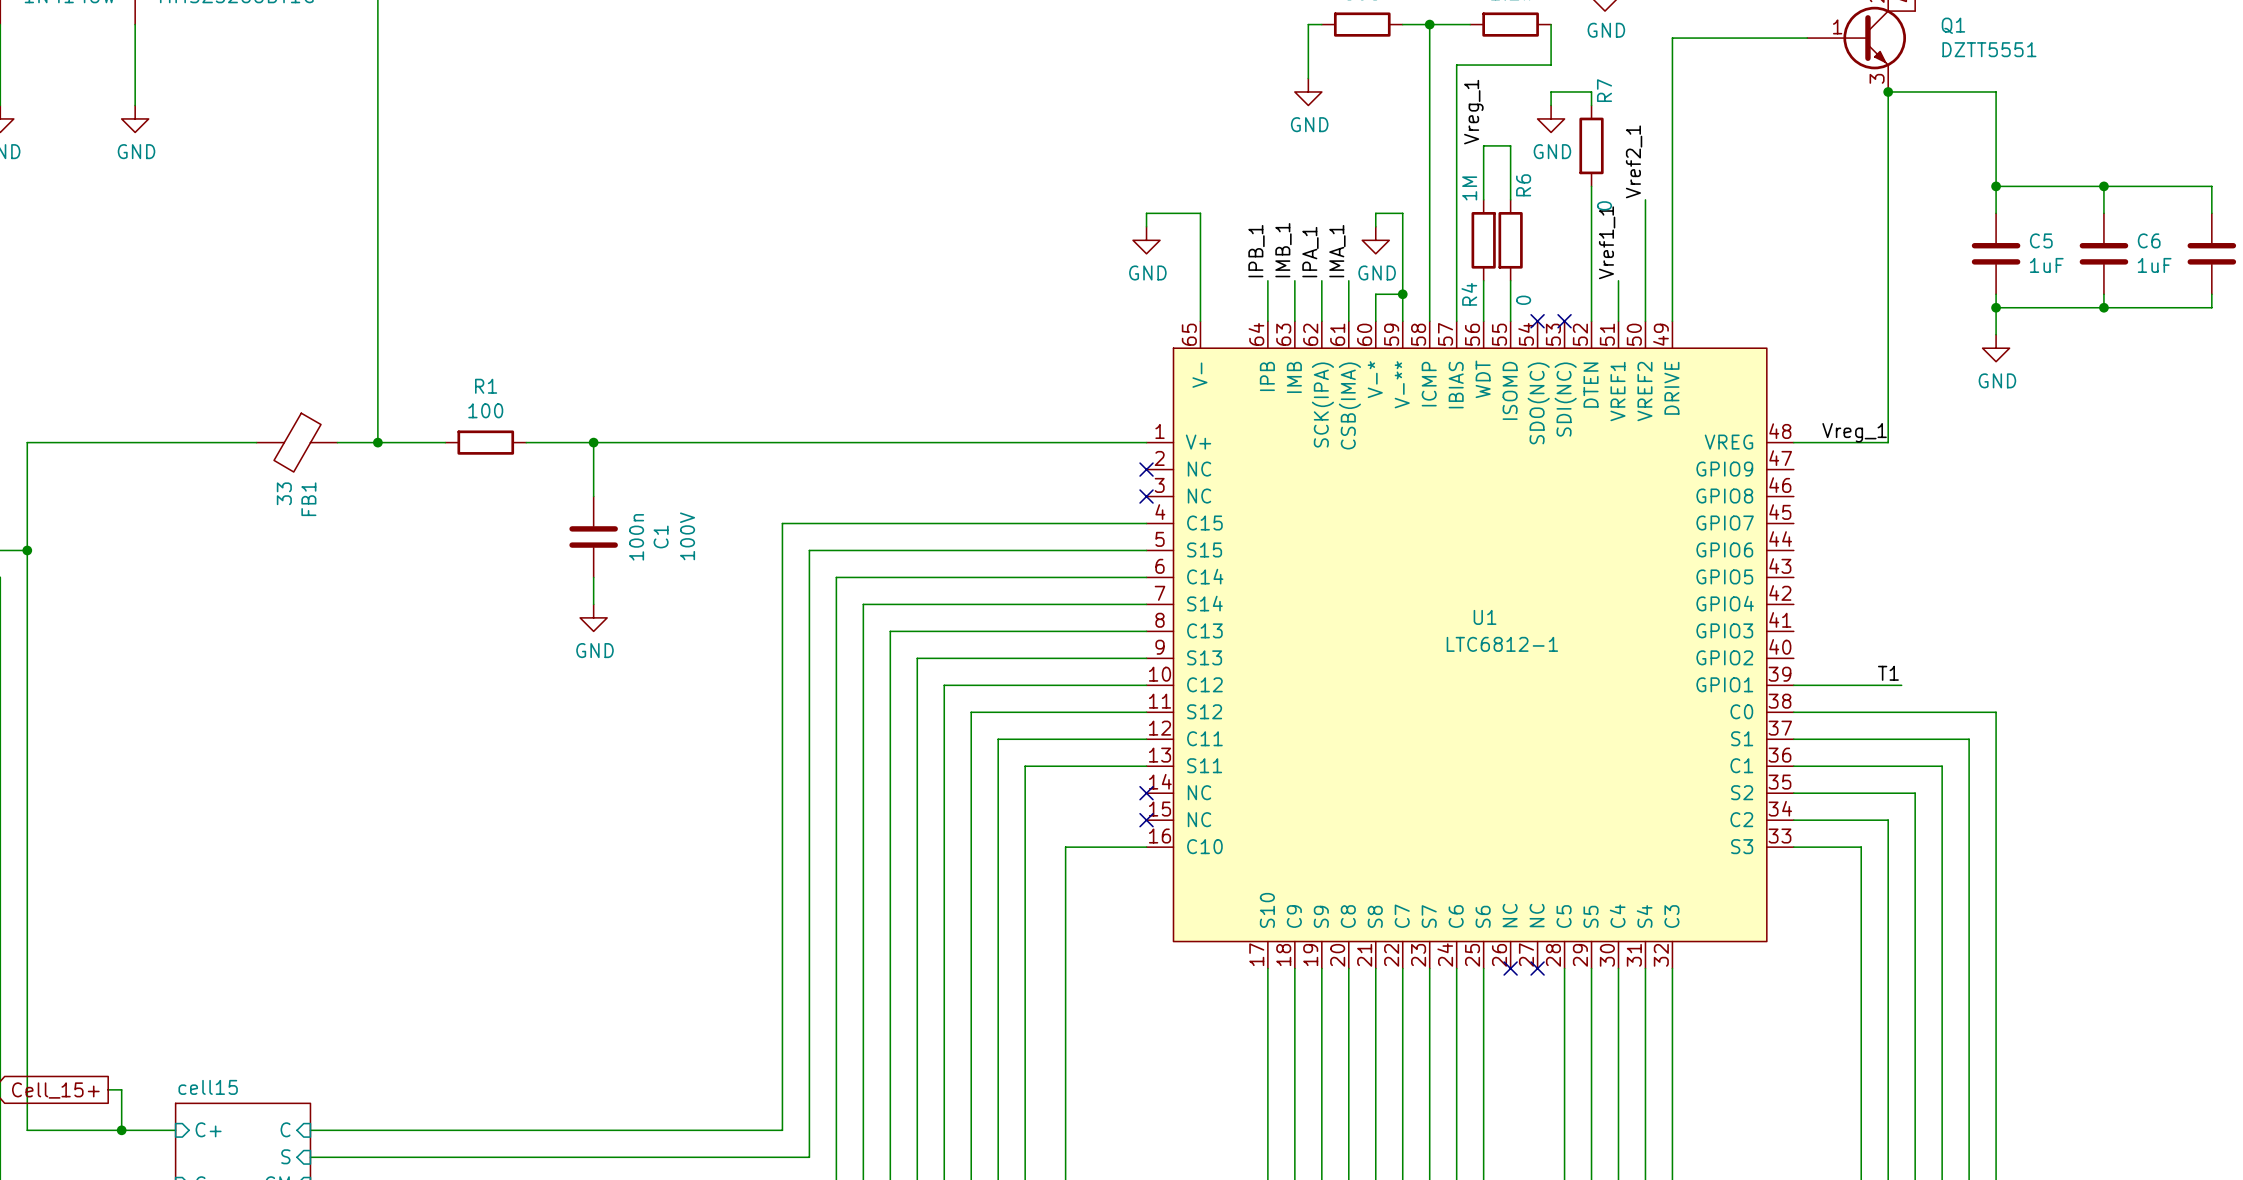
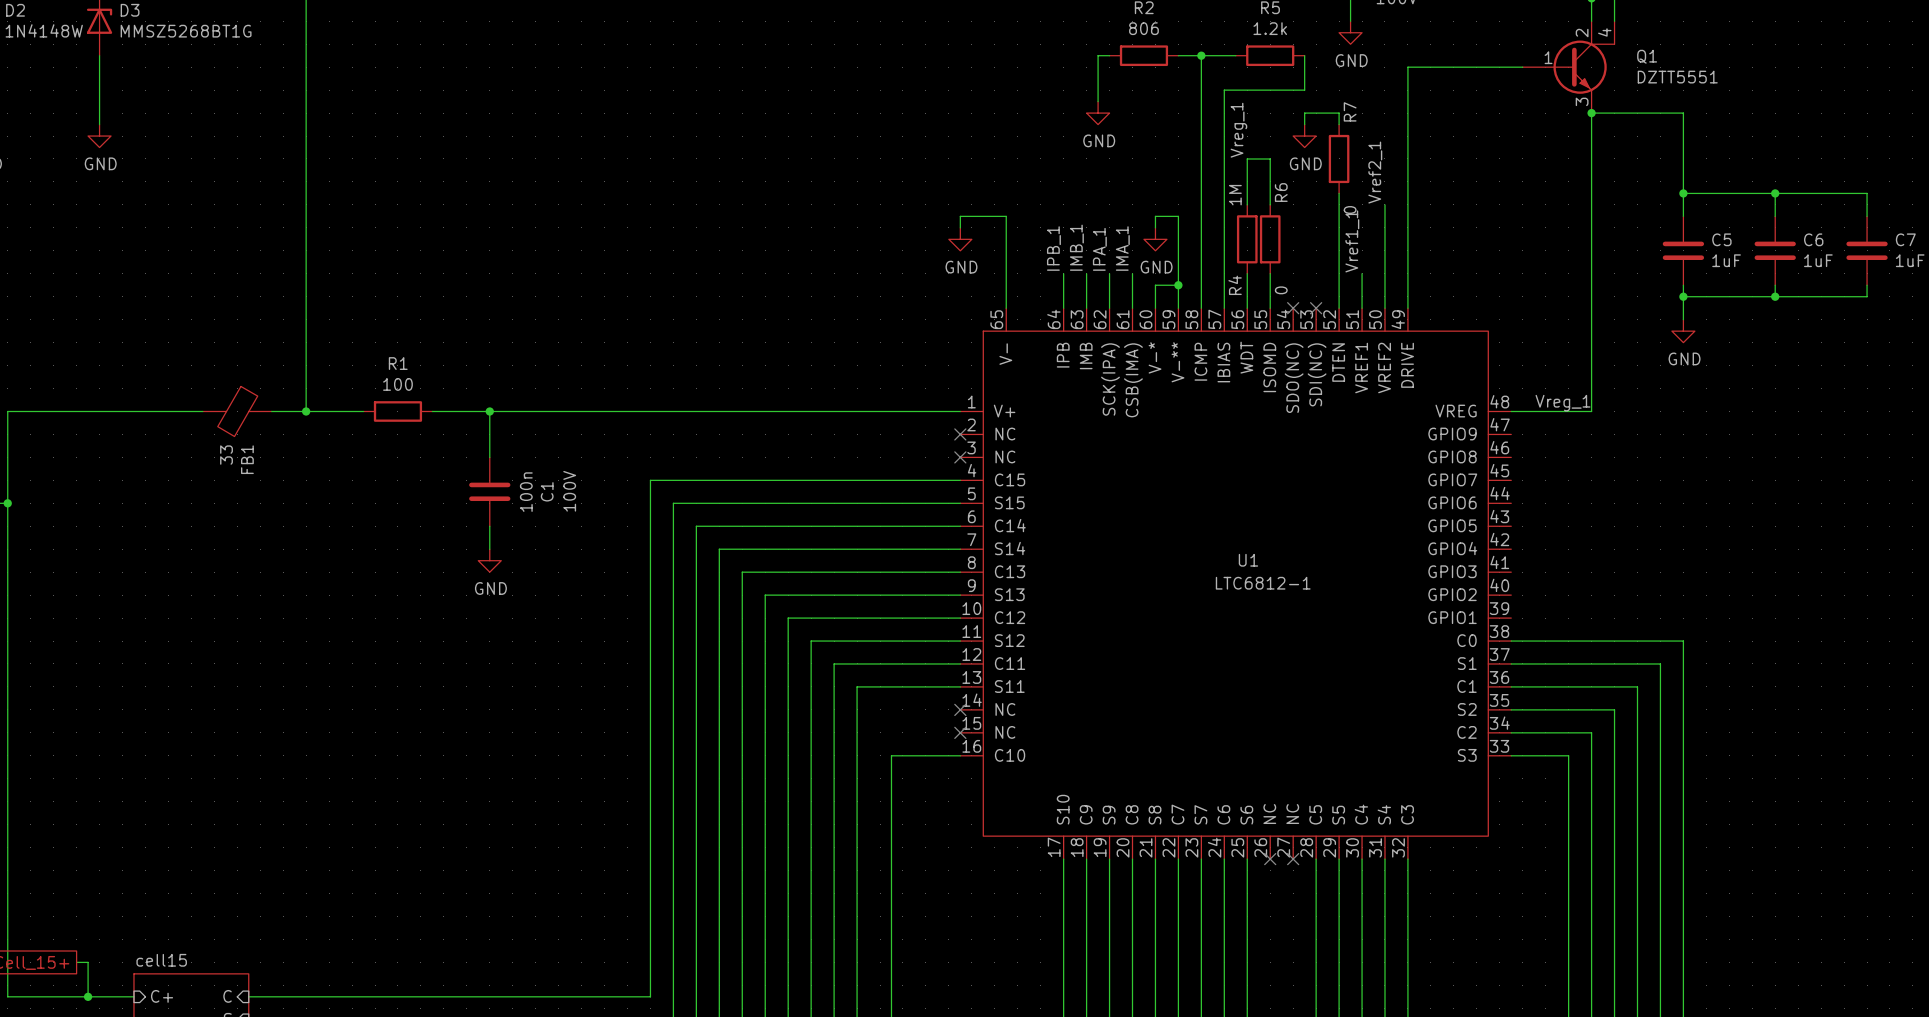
label: T1 (1888, 673) -> none
wire: (1793, 685) (1901, 685) -> none

